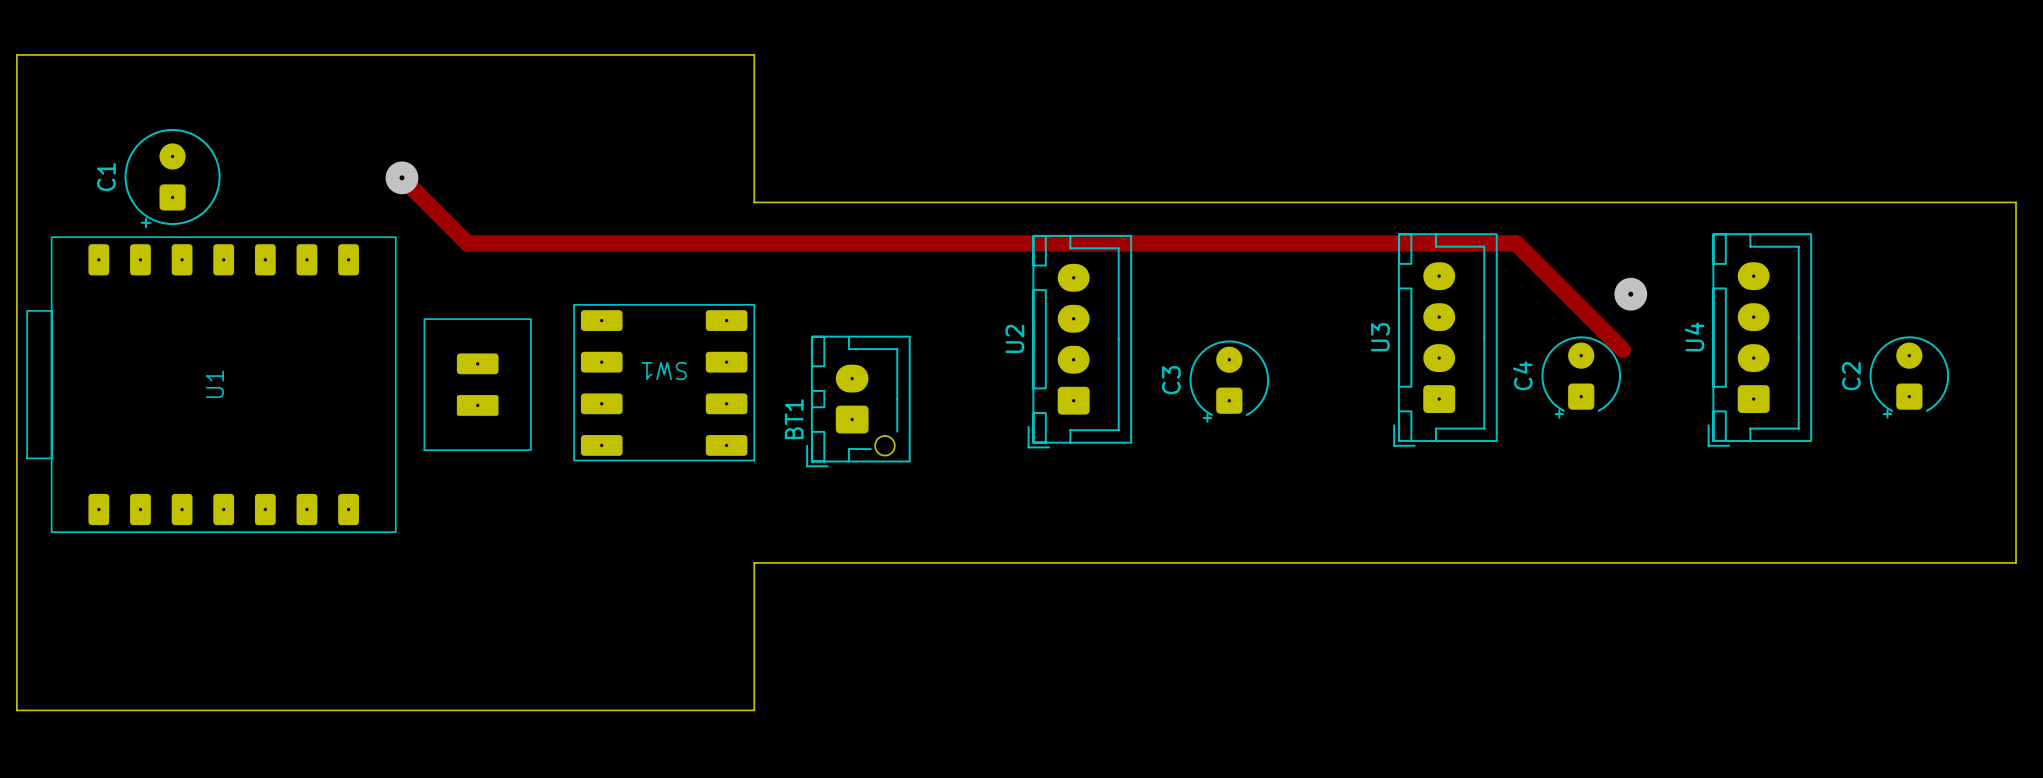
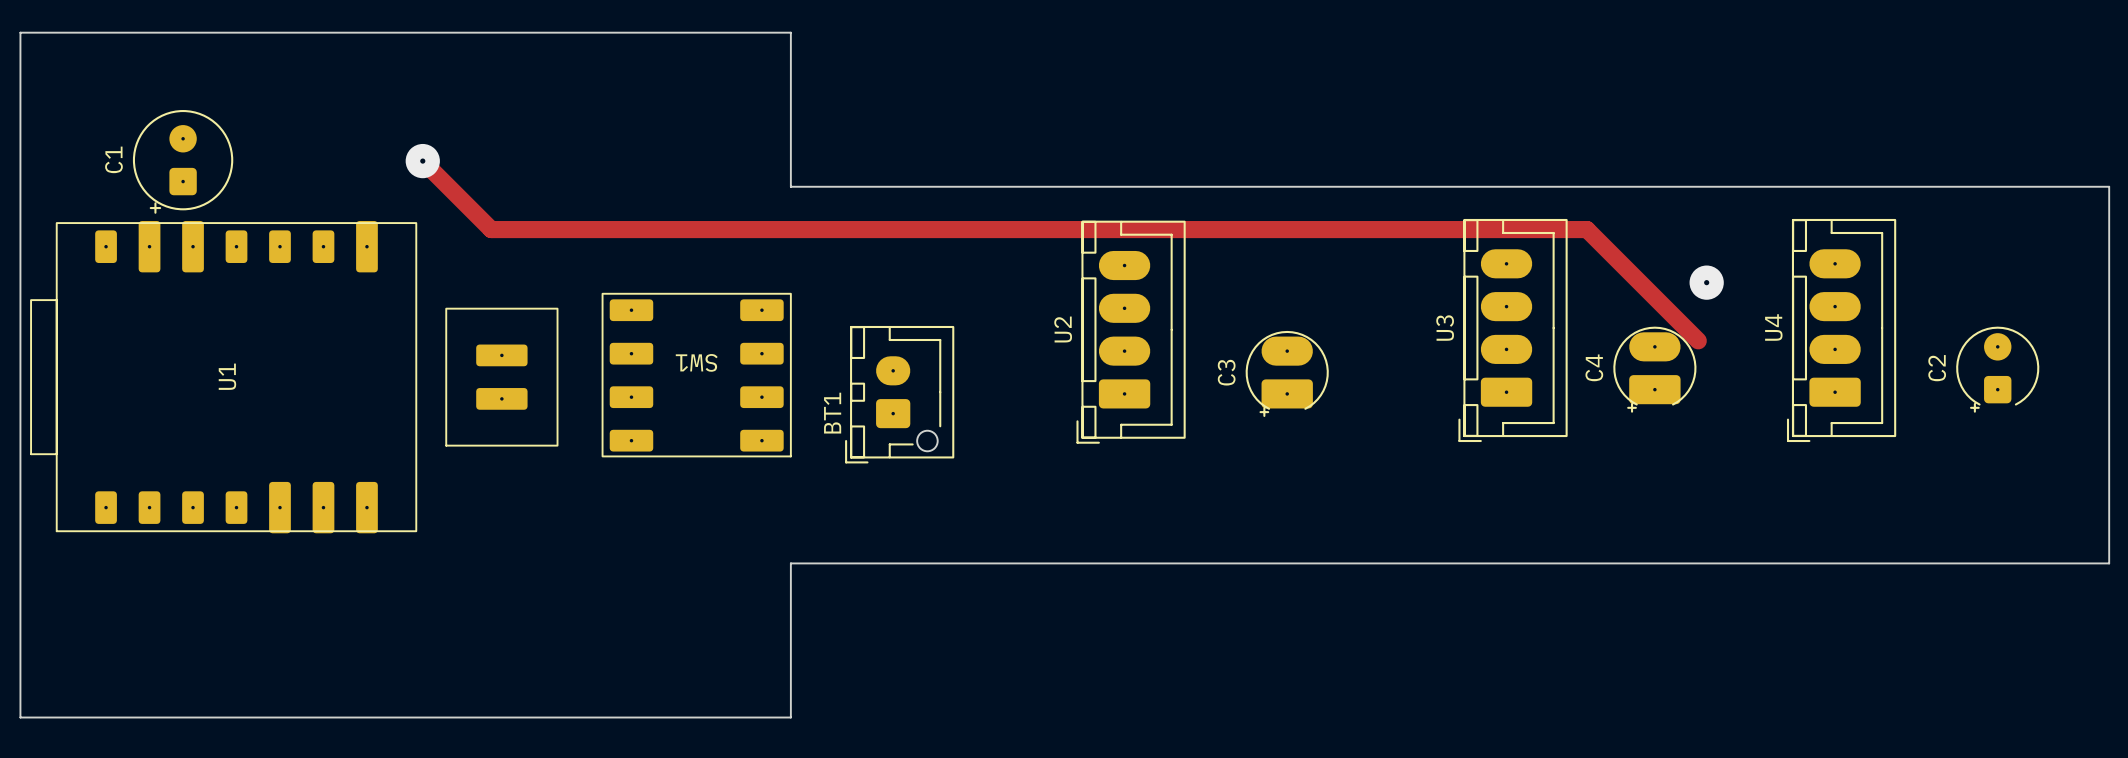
U3 footprint: [1393, 233, 1498, 447] -> [1458, 218, 1568, 443]
U4 footprint: [1707, 233, 1813, 447] -> [1786, 218, 1897, 443]
U2 footprint: [1027, 234, 1133, 449] -> [1076, 220, 1186, 444]
U1 footprint: [26, 236, 532, 533] -> [30, 221, 559, 534]
C4 footprint: [1541, 336, 1622, 419] -> [1613, 326, 1697, 413]
C3 footprint: [1189, 340, 1270, 423] -> [1245, 330, 1329, 417]

